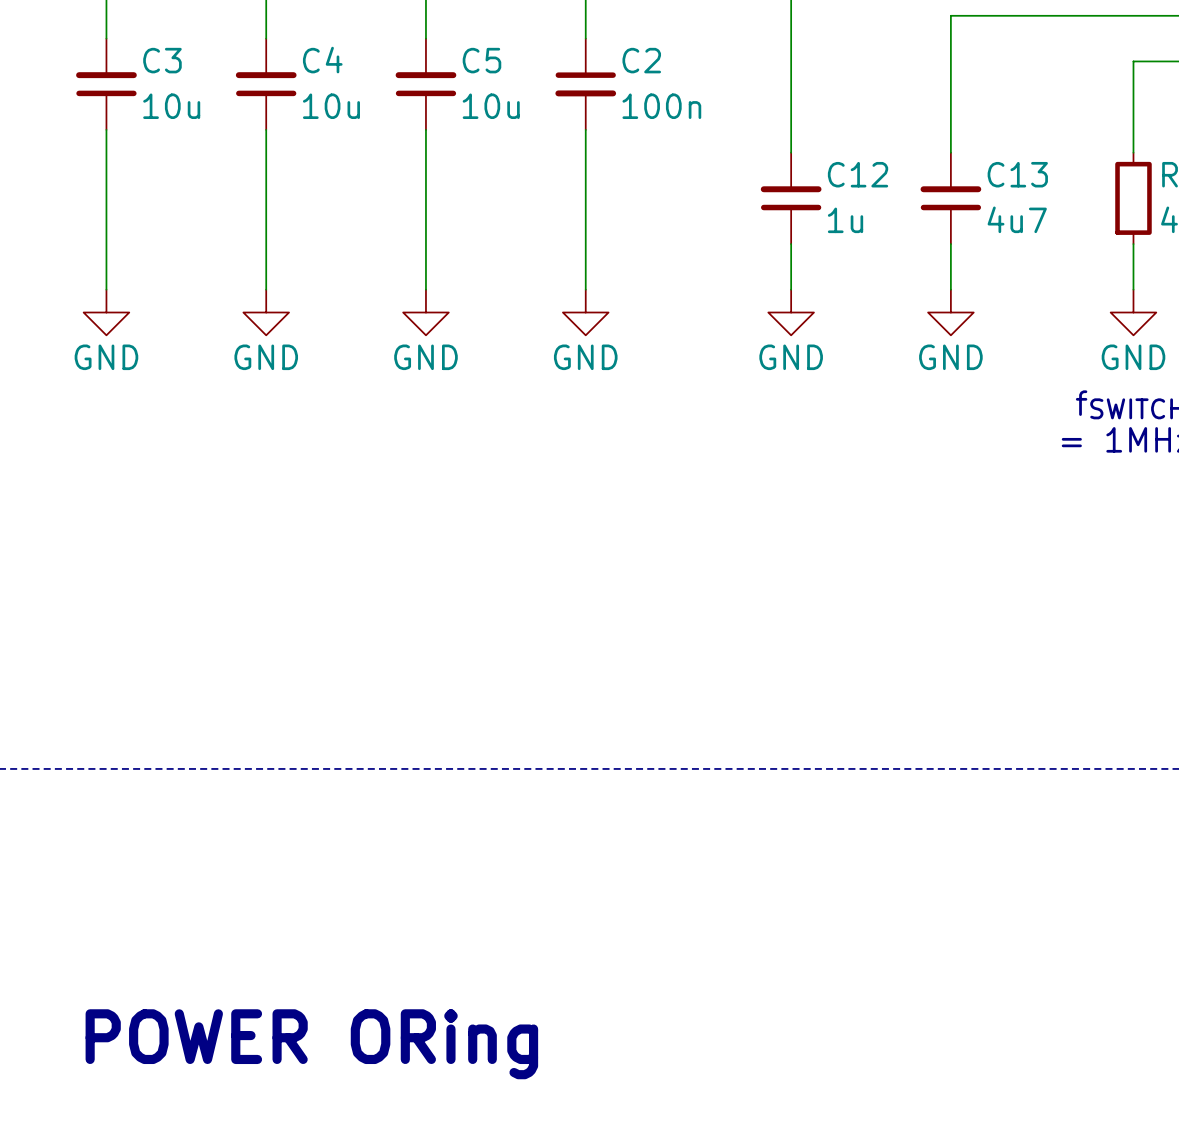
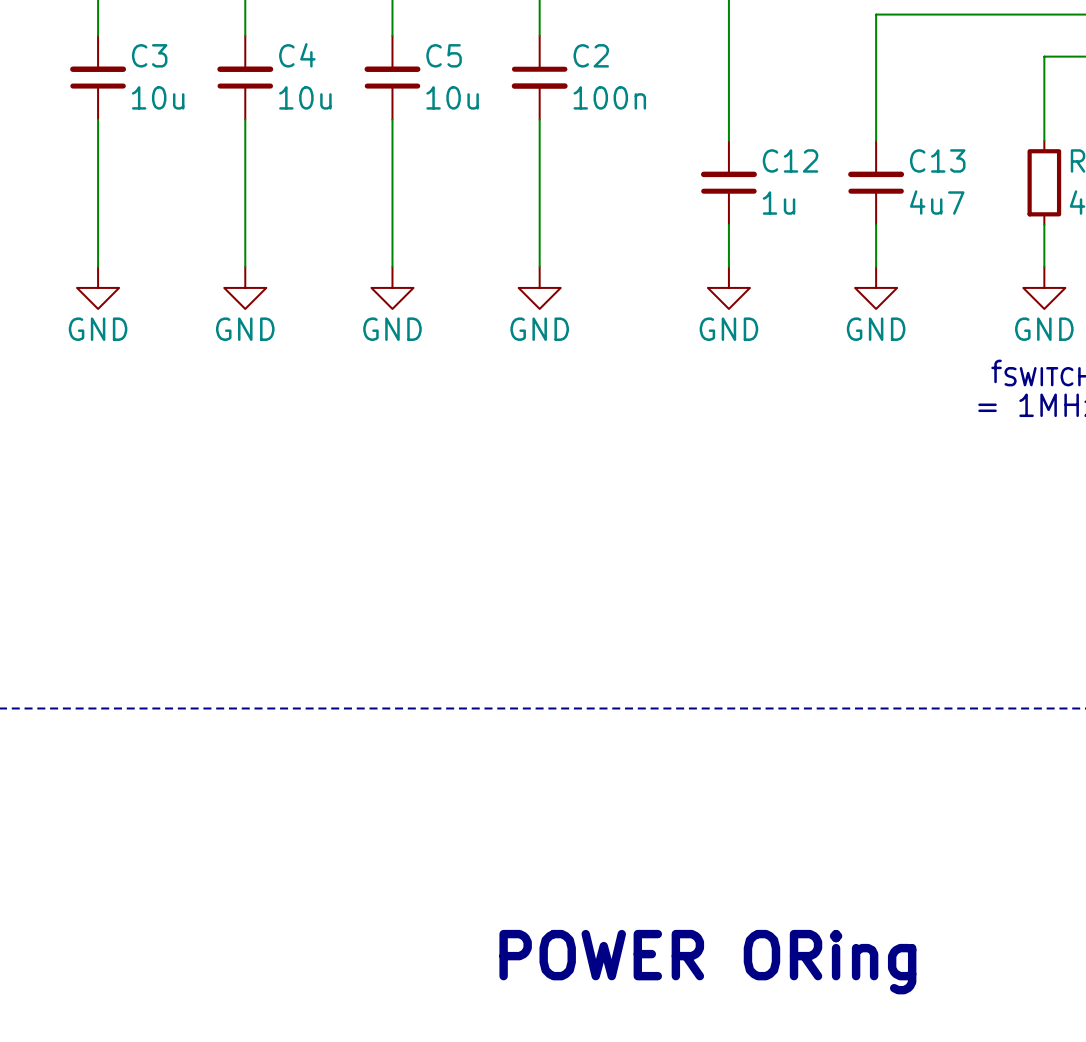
text: POWER ORing (311, 1044) -> none
text: none -> POWER ORing (707, 962)

